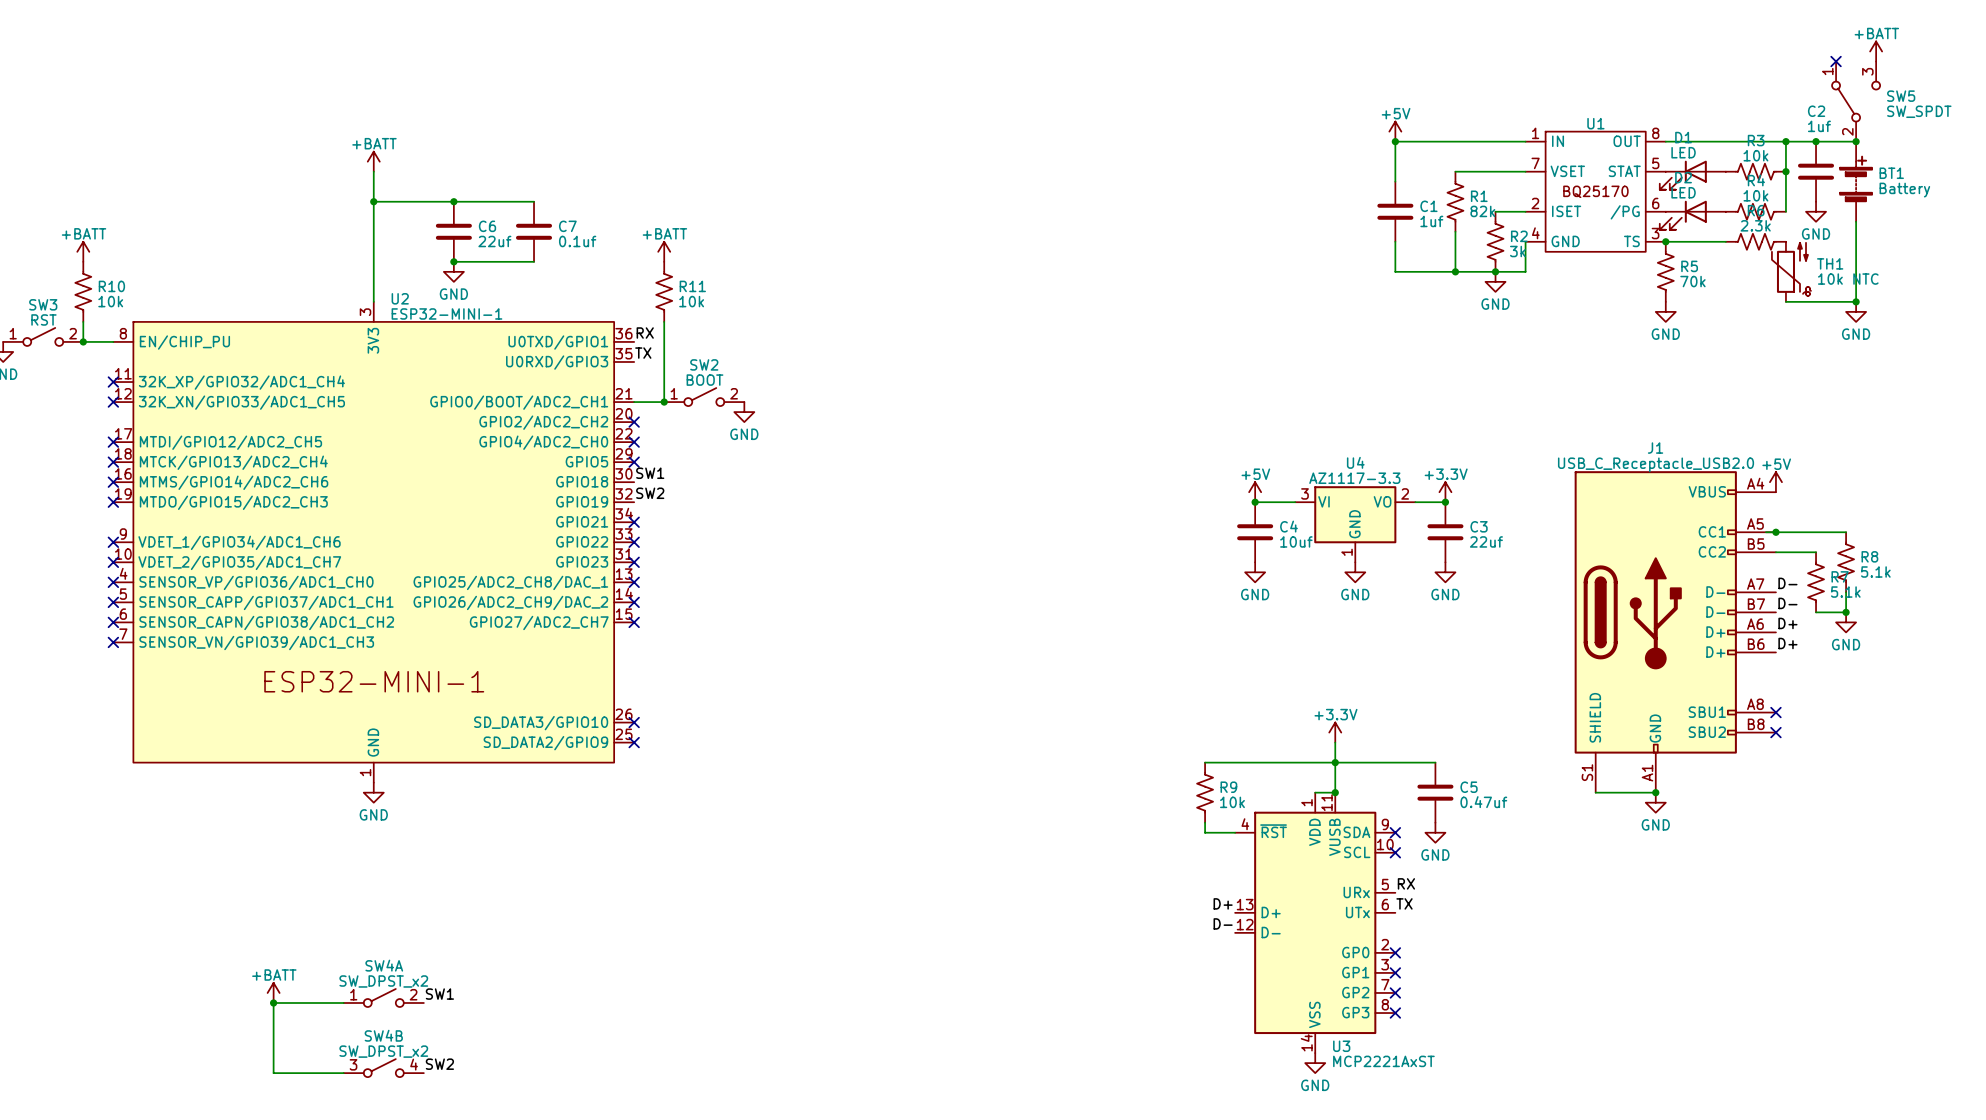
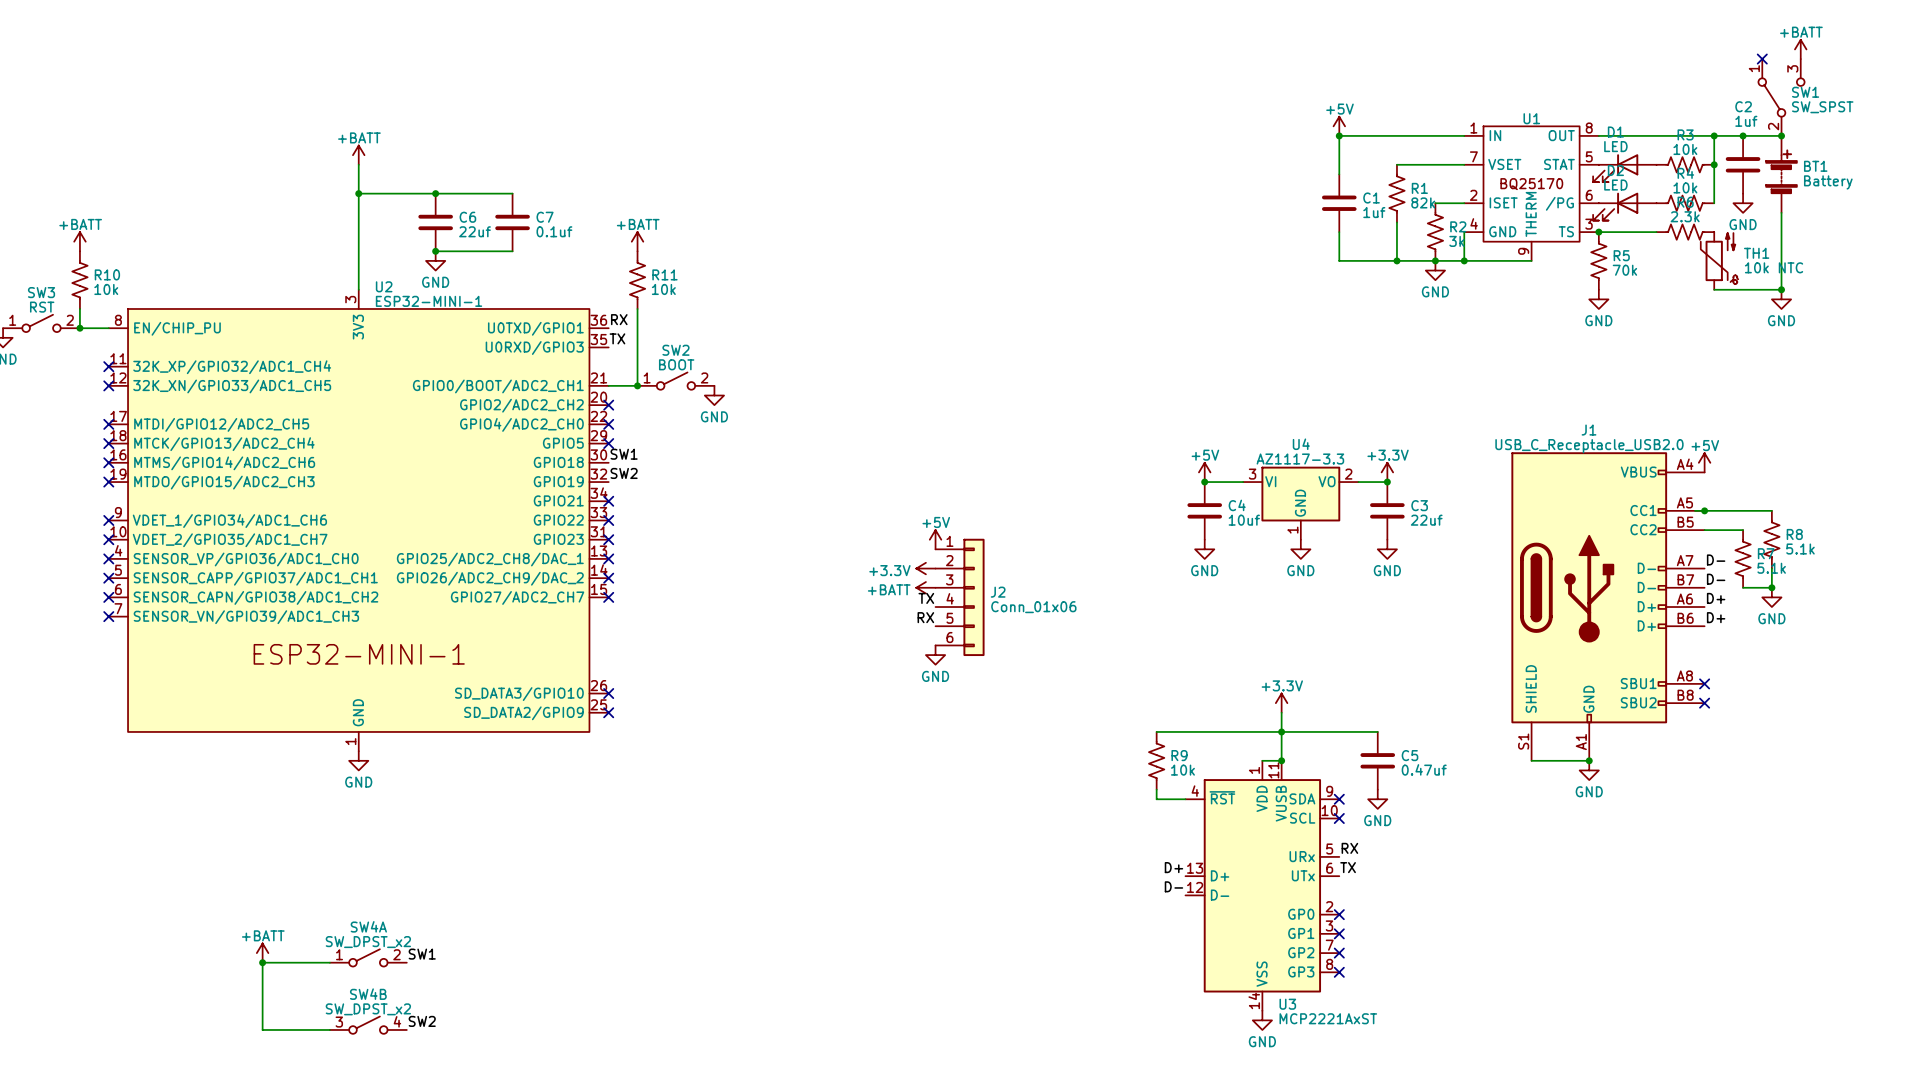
SW5 name: SW5 (1901, 96) -> SW1 (1805, 92)
SW5 value: SW_SPDT (1919, 111) -> SW_SPST (1822, 107)
U1 symbol: [1525, 131, 1666, 252] -> [1464, 126, 1599, 261]
wire: none -> (1464, 260) (1531, 260)
junction: none -> (1464, 260)
power symbol: none -> +5V (935, 539)
power symbol: none -> +3.3V (925, 568)
power symbol: none -> +BATT (925, 587)
J2: none -> Conn_01x06 (960, 597)
label: none -> TX (926, 598)
label: none -> RX (925, 617)
power symbol: none -> GND (935, 655)

